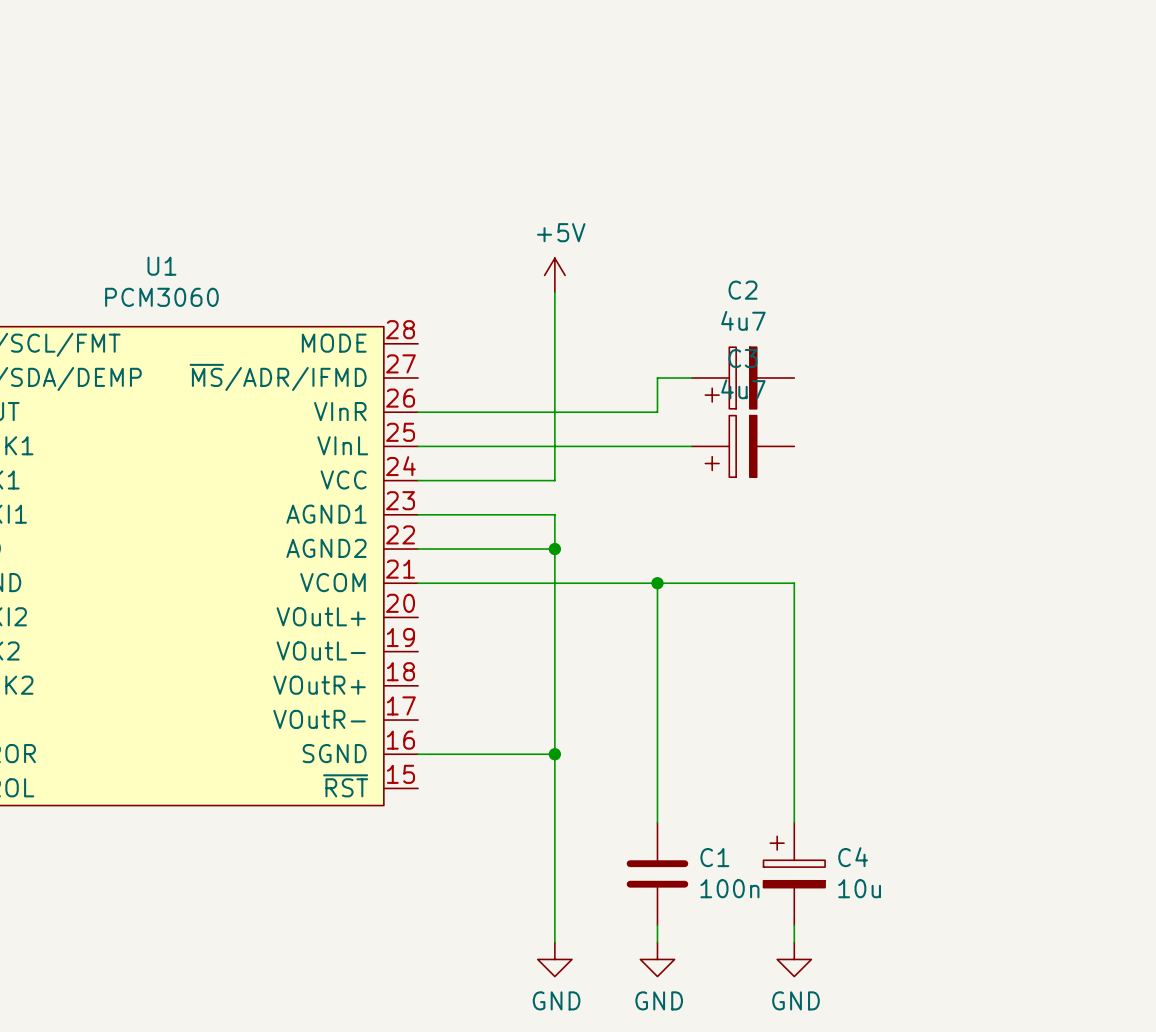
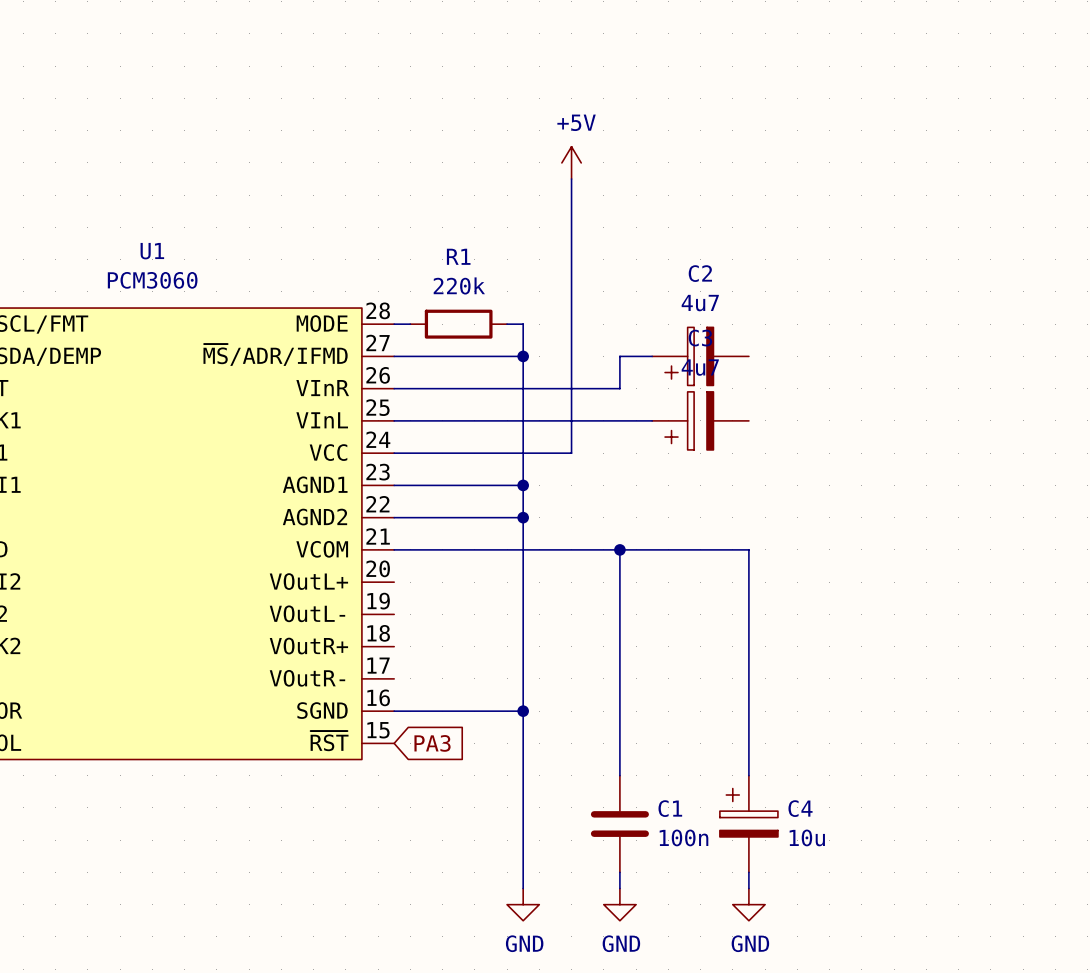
wire: none -> (571, 179) (571, 453) (523, 453) (523, 485)
power symbol position: +5V (554, 275) -> +5V (571, 162)
wire: (554, 292) (554, 343) -> (507, 324) (523, 324)
wire: none -> (394, 324) (410, 324)
R1: none -> 220k (458, 324)
wire: none -> (394, 356) (523, 356)
junction: none -> (523, 356)
junction: none -> (523, 485)
global label: none -> PA3 (432, 743)

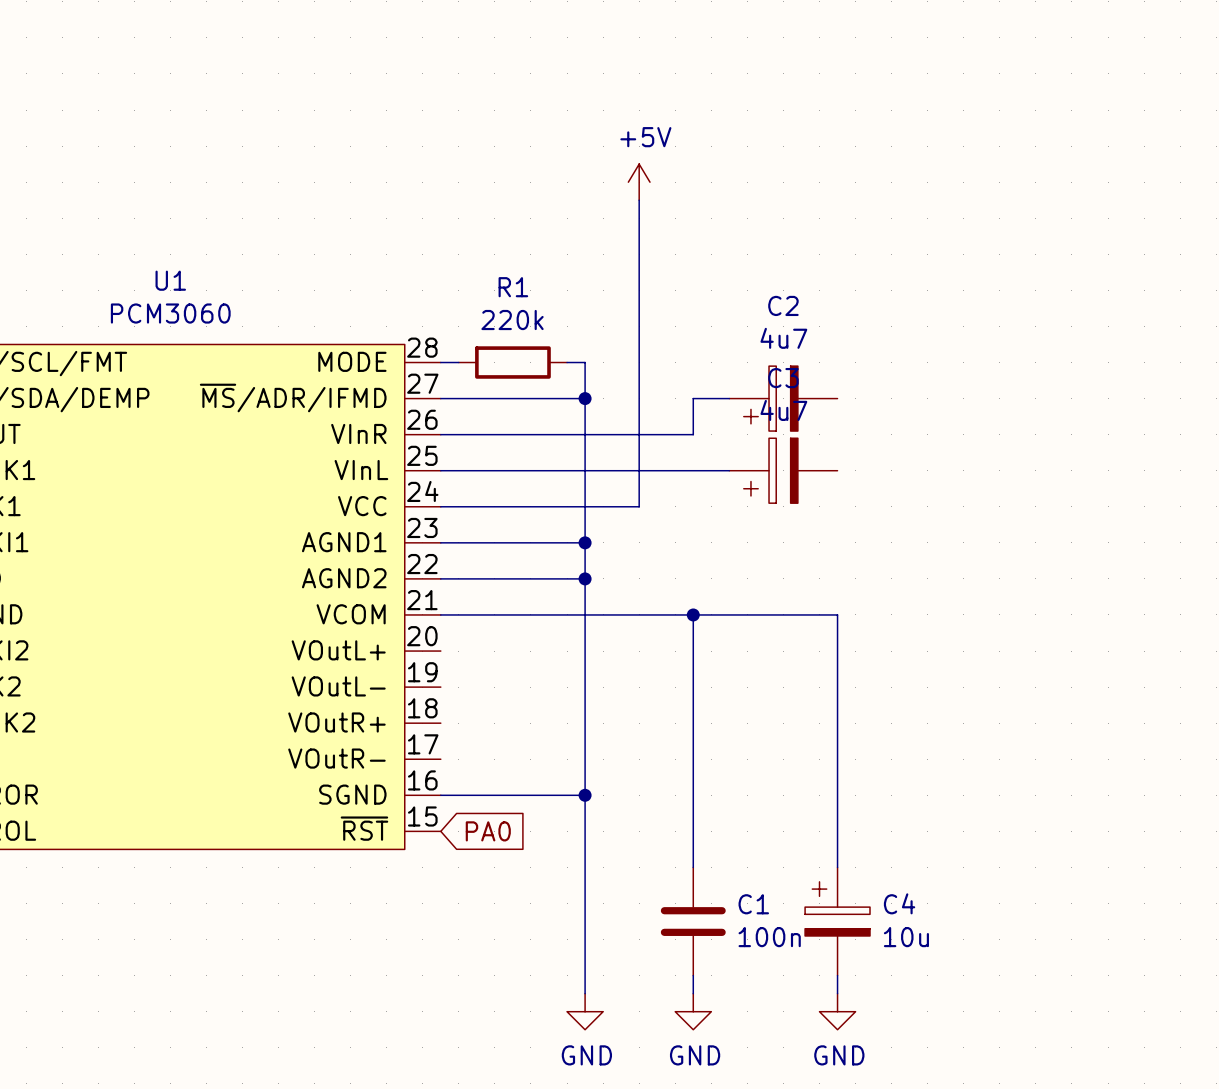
global label: PA3 (432, 743) -> PA0 (488, 831)

